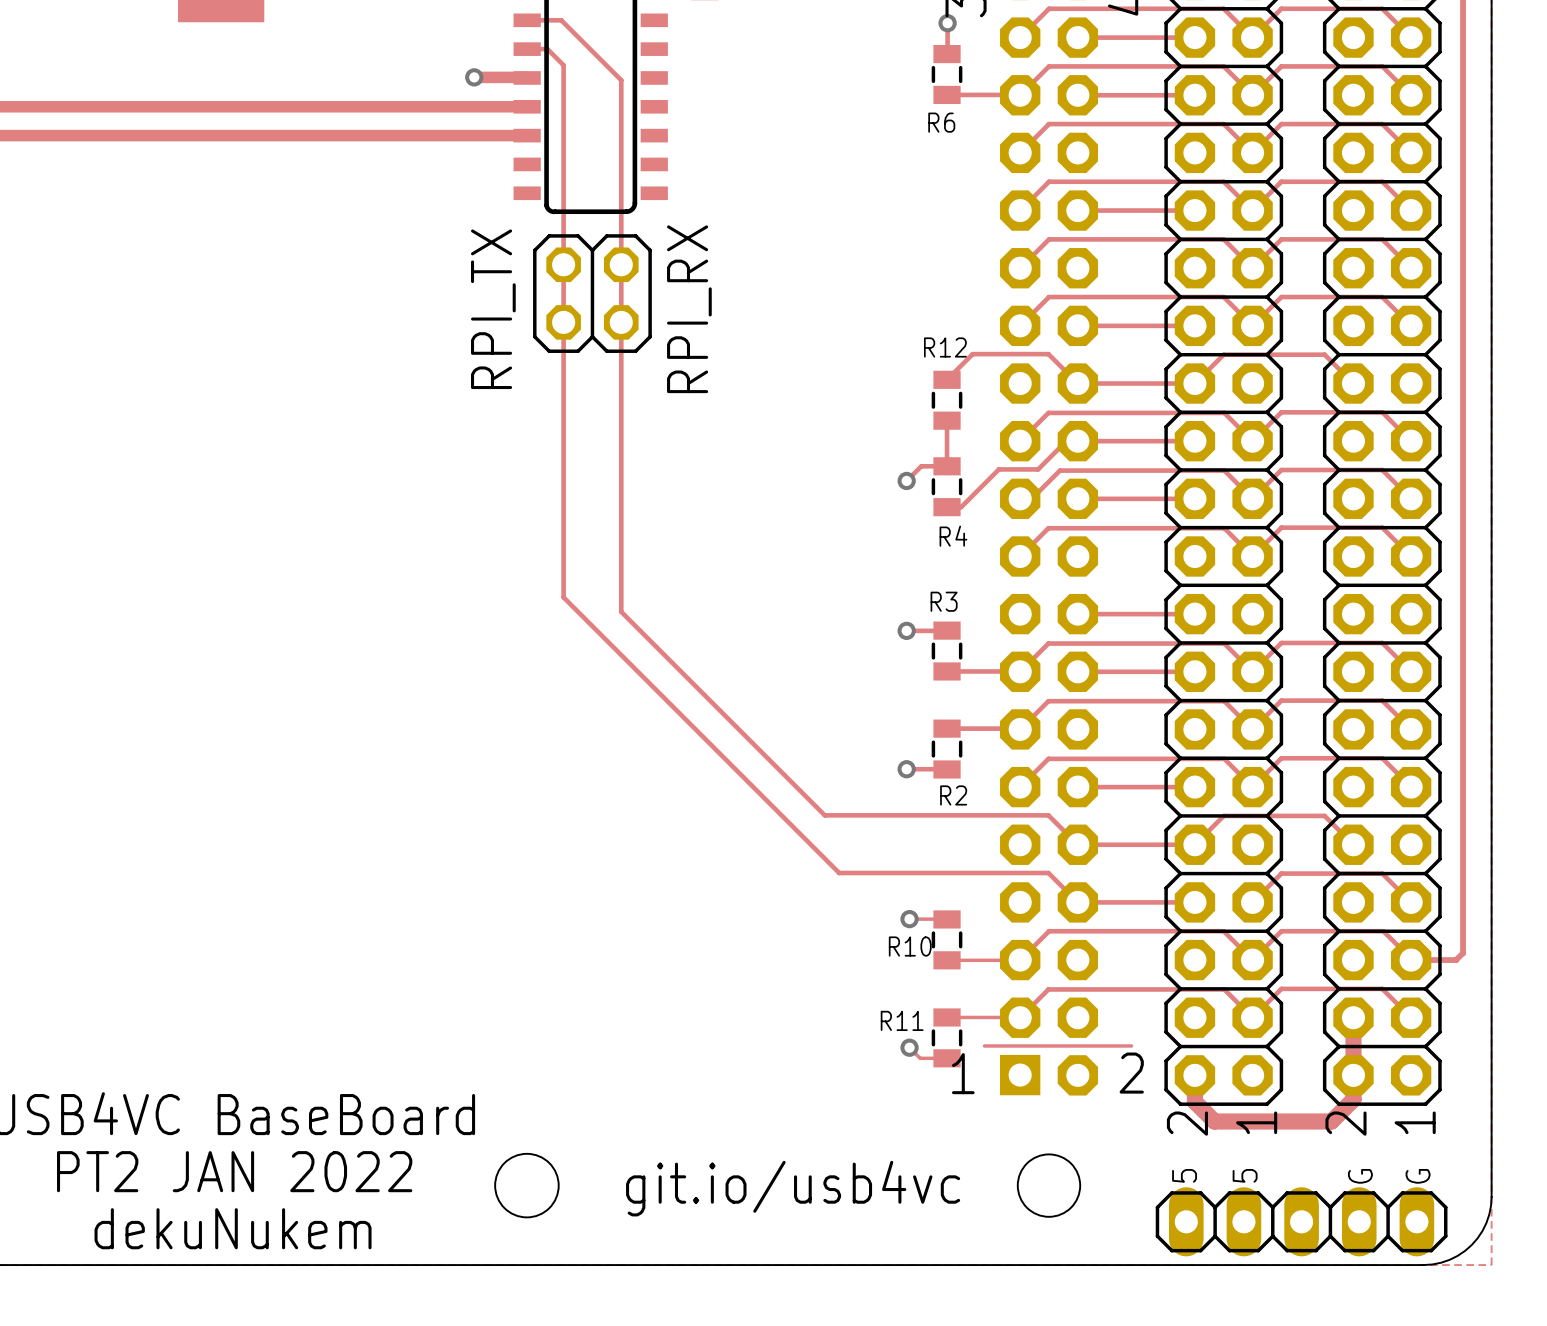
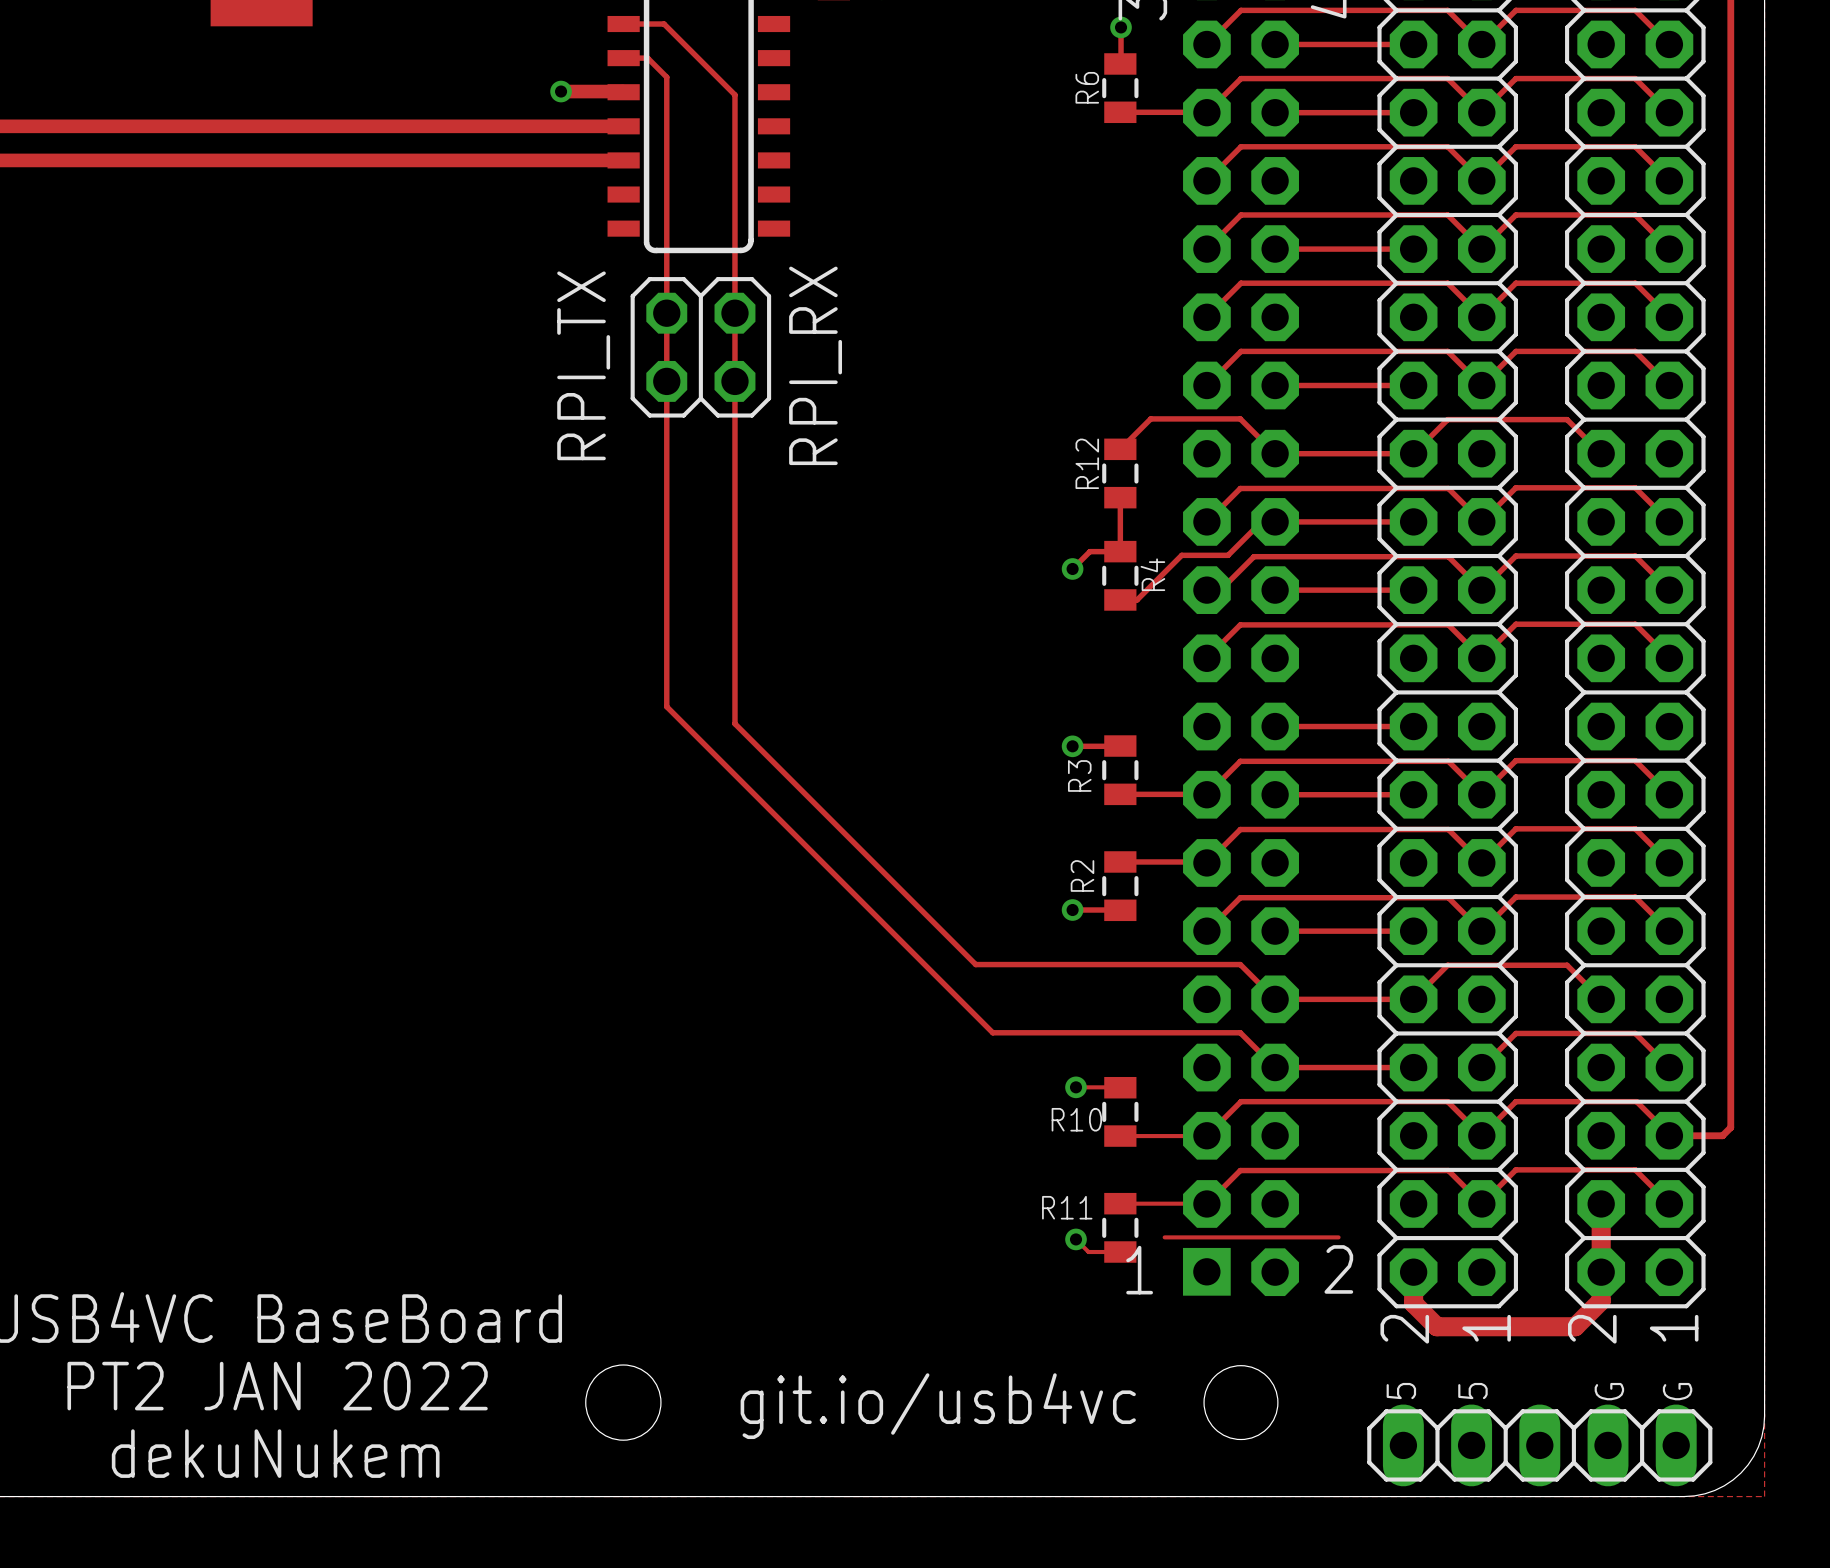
R6 name rotation: 0° (941, 122) -> 90° counterclockwise (1087, 87)
R6 name position: R6 (941, 122) -> R6 (1087, 87)
R12 name rotation: 0° (945, 347) -> 90° counterclockwise (1087, 463)
R4 name rotation: 0° (953, 536) -> 90° counterclockwise (1152, 574)
R4 name position: R4 (953, 536) -> R4 (1152, 574)
R3 name rotation: 0° (944, 601) -> 90° counterclockwise (1079, 775)
R3 name position: R3 (944, 601) -> R3 (1079, 775)
R2 name rotation: 0° (953, 795) -> 90° counterclockwise (1082, 875)
R2 name position: R2 (953, 795) -> R2 (1082, 875)

